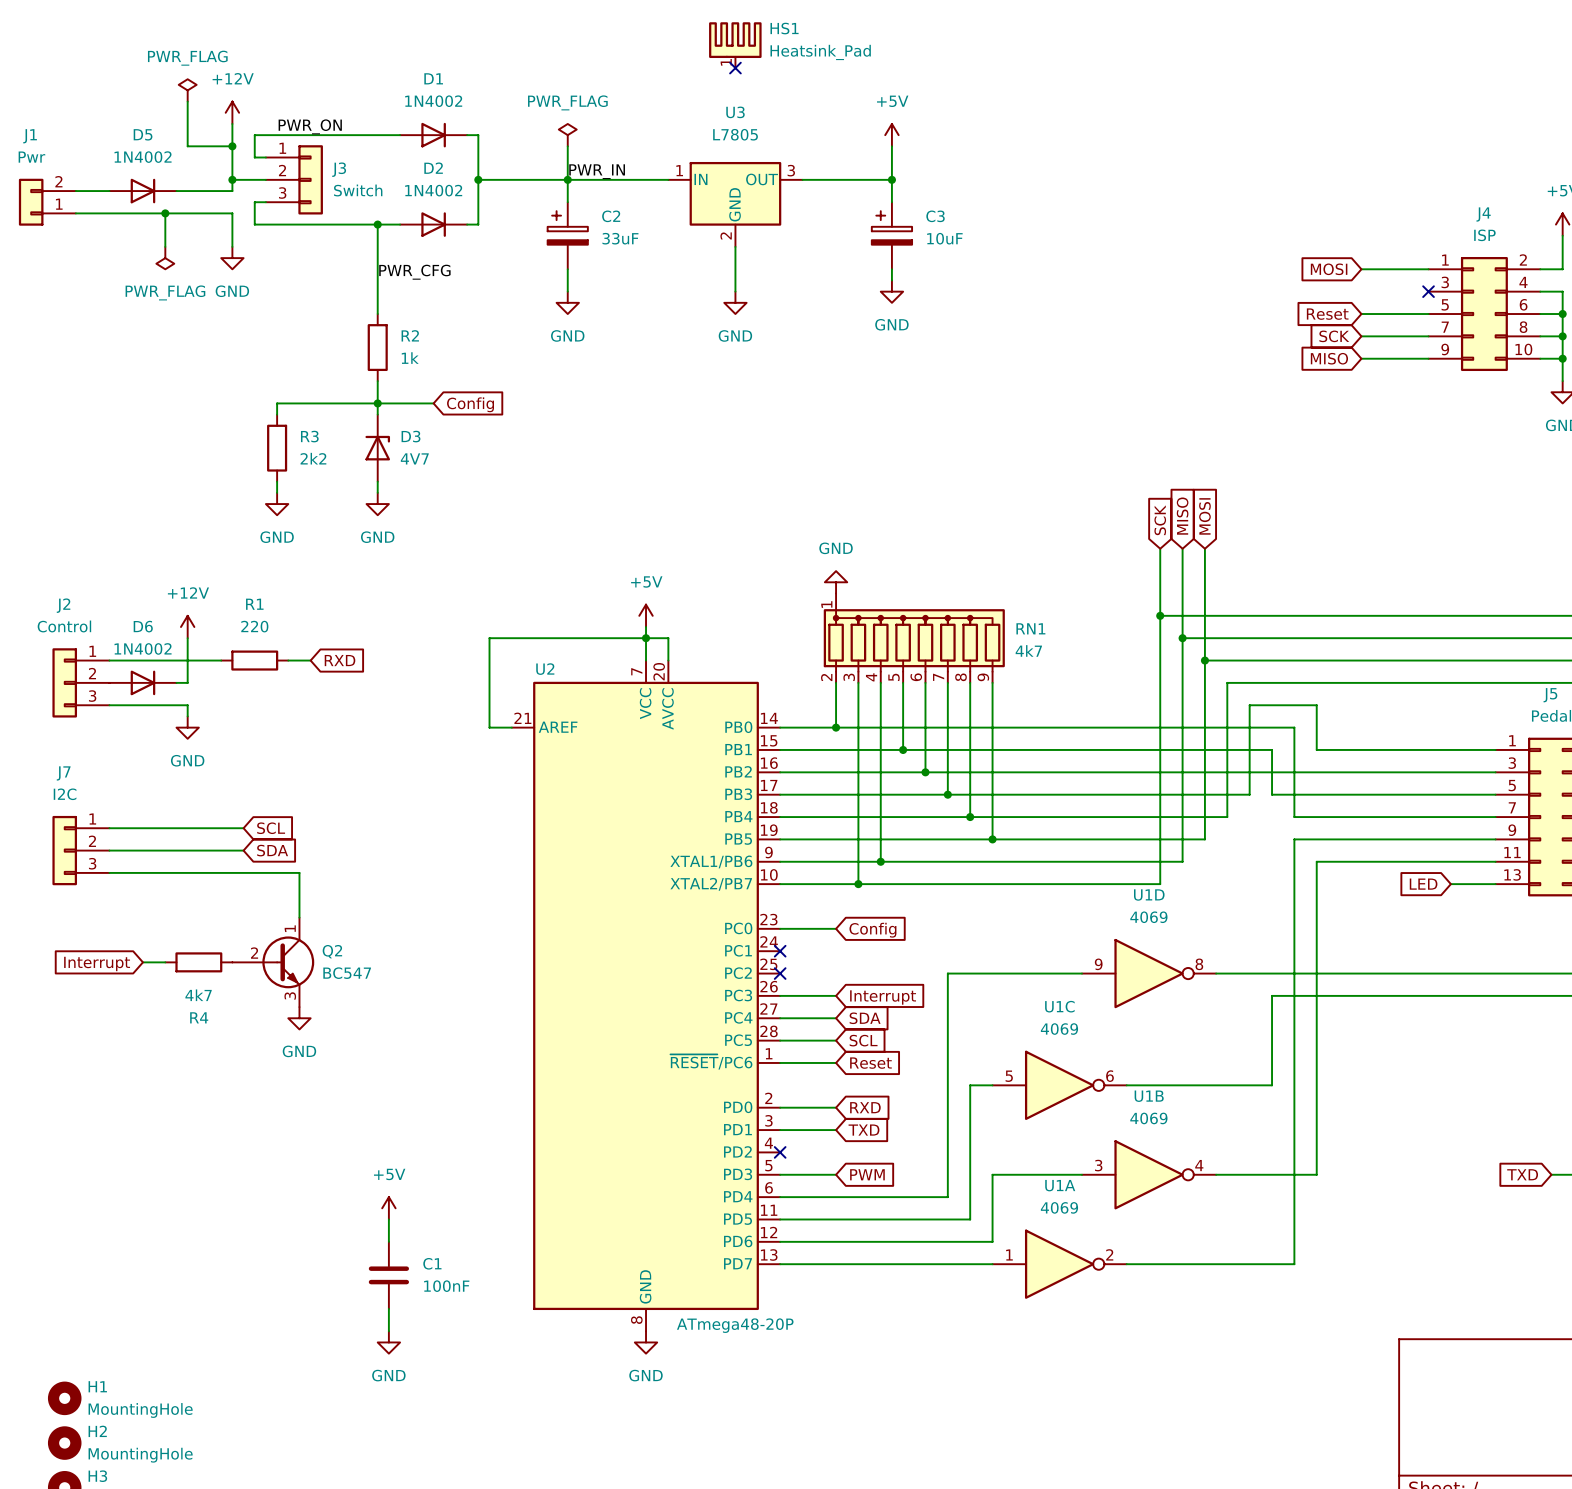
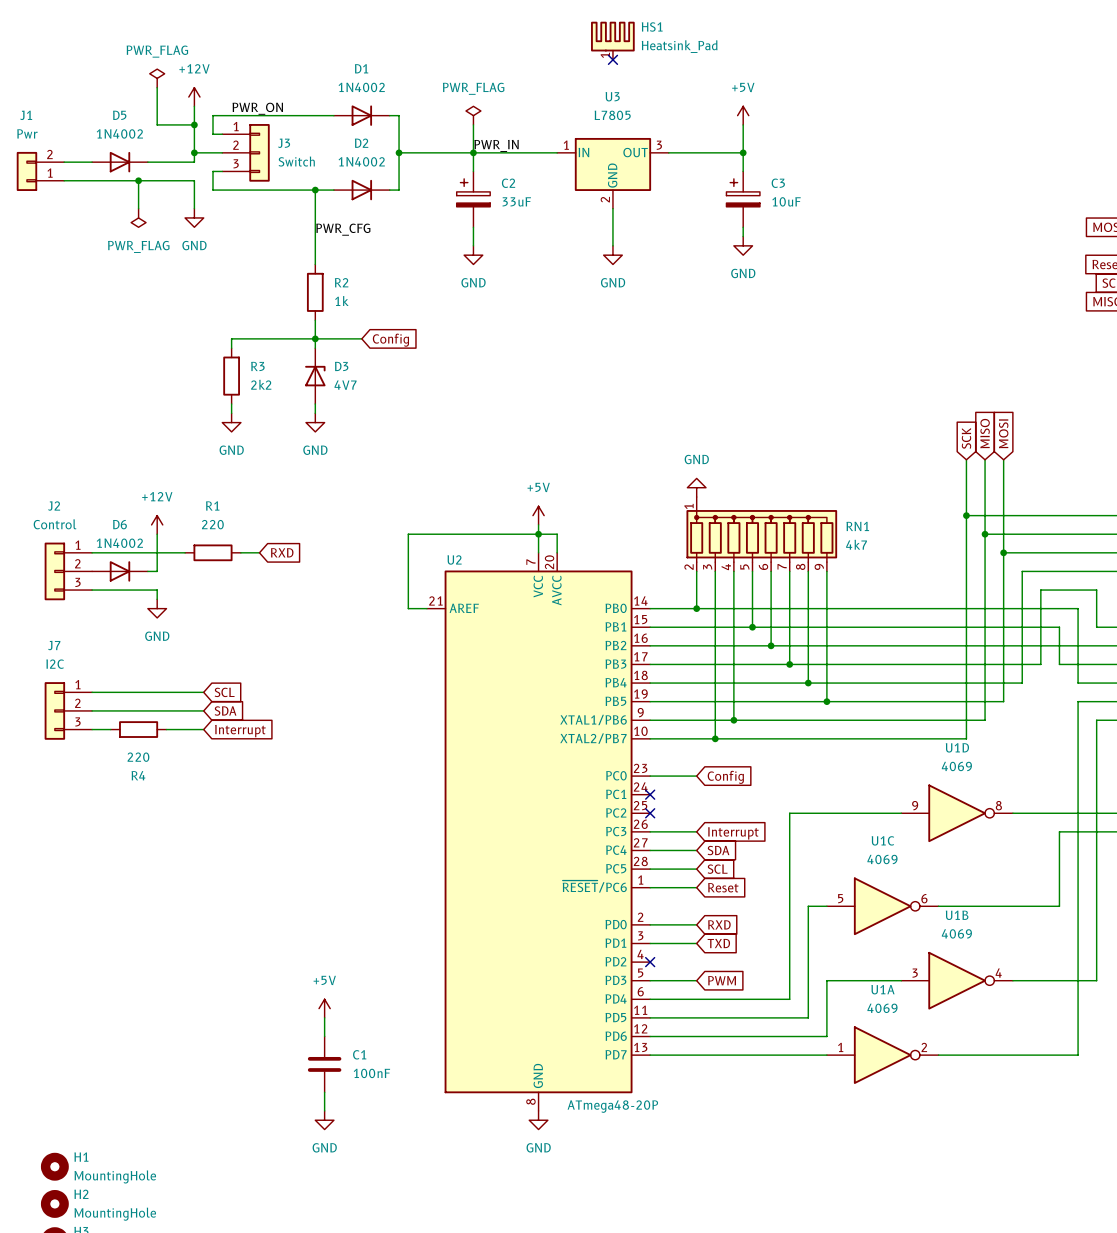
wire: (131, 872) (198, 872) -> none
wire: (243, 872) (299, 872) (299, 917) -> none
wire: (142, 962) (165, 962) -> none
R4 position: (198, 962) -> (138, 729)
Q2: BC547 (273, 962) -> none
global label rotation: 0° (97, 963) -> 180° (240, 731)
global label position: Interrupt (97, 963) -> Interrupt (240, 731)
R4 value: 4k7 (198, 995) -> 220 (138, 757)
power symbol: GND (299, 1018) -> none

